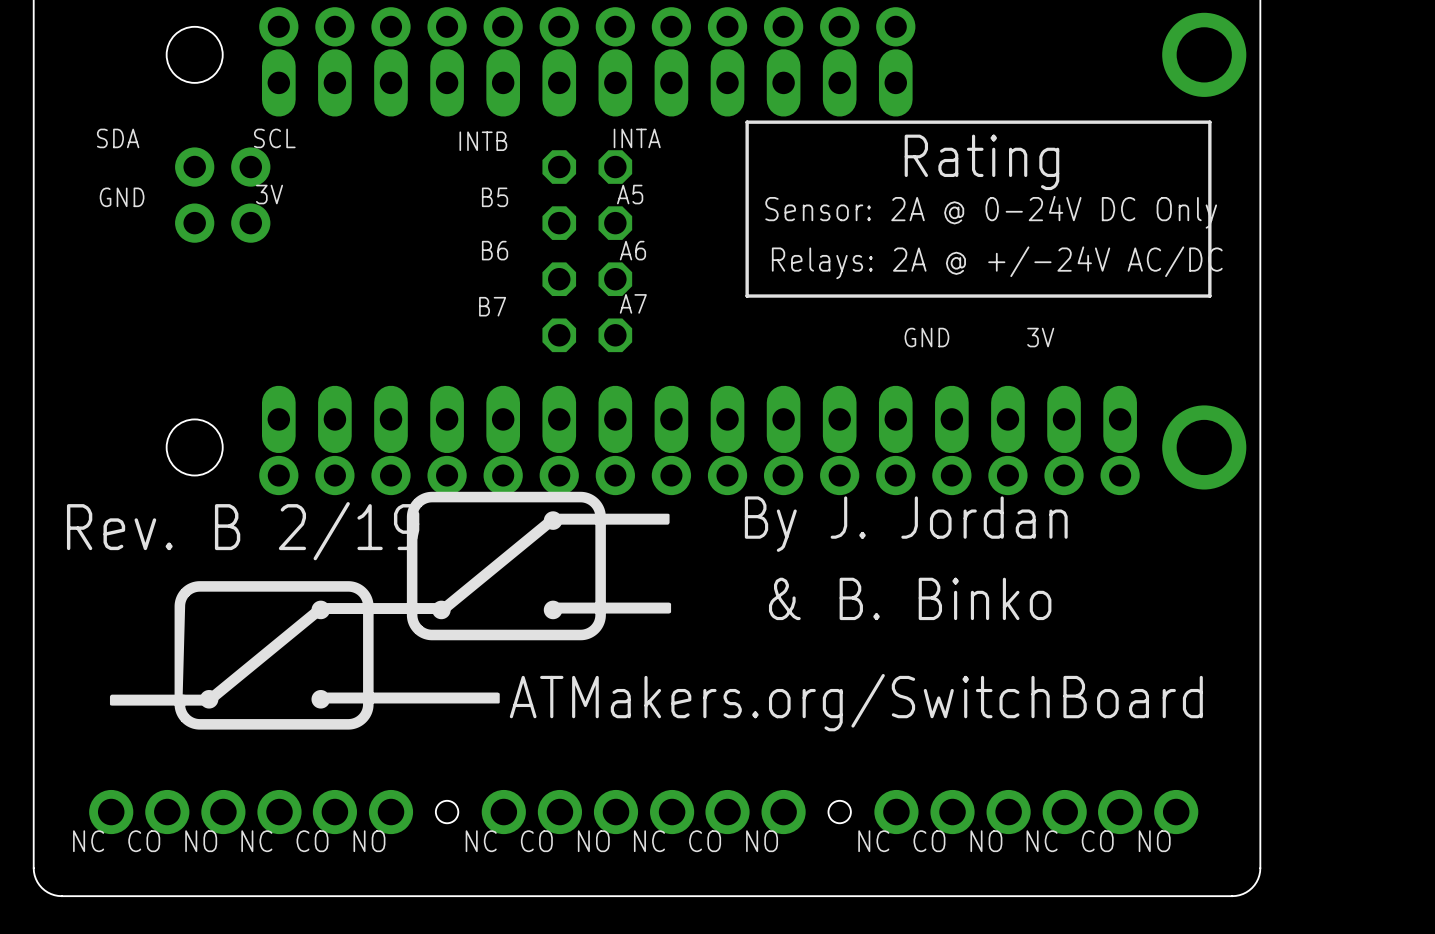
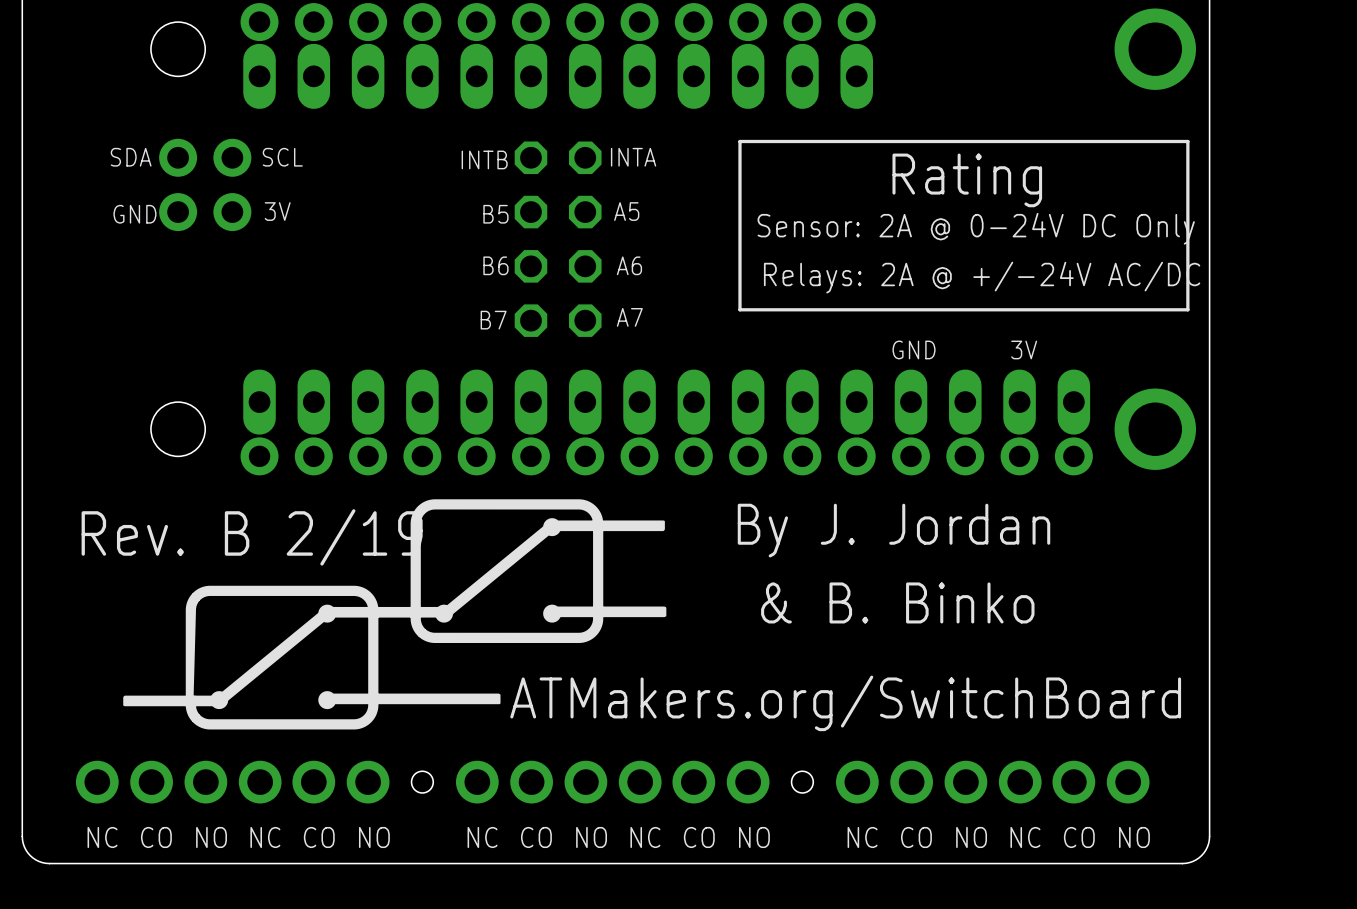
line: (1209, 122) (747, 122) (747, 296) (1209, 296) (1209, 122) -> (1187, 141) (739, 141) (739, 309) (1187, 309) (1187, 141)
text position: SDA (118, 138) -> SDA (131, 157)
text position: SCL (274, 138) -> SCL (282, 157)
text position: INTA (637, 138) -> INTA (633, 157)
text position: INTB (483, 141) -> INTB (484, 159)
text position: Rating (981, 162) -> Rating (967, 180)
text position: 3V (269, 194) -> 3V (277, 211)
text position: A5 (630, 194) -> A5 (626, 211)
text position: GND (122, 197) -> GND (134, 214)
text position: B5 (495, 197) -> B5 (495, 214)
text position: Sensor: 2A @ 0-24V DC Only (991, 212) -> Sensor: 2A @ 0-24V DC Only (976, 228)
text position: B6 (495, 250) -> B6 (495, 265)
text position: A6 (632, 250) -> A6 (629, 265)
text position: Relays: 2A @ +/-24V AC/DC (997, 262) -> Relays: 2A @ +/-24V AC/DC (982, 277)
text position: A7 (633, 303) -> A7 (629, 317)
text position: B7 (492, 306) -> B7 (493, 320)
text position: GND (926, 337) -> GND (914, 349)
text position: 3V (1040, 337) -> 3V (1024, 349)
text position: By J. Jordan (906, 524) -> By J. Jordan (893, 530)
text position: Rev. B 2/19 (243, 531) -> Rev. B 2/19 (252, 537)
text position: & B. Binko (910, 598) -> & B. Binko (897, 602)
drawing position: (390, 610) -> (394, 614)
text position: ATMakers.org/SwitchBoard (856, 702) -> ATMakers.org/SwitchBoard (845, 703)
text position: NC (88, 841) -> NC (102, 837)
text position: CO (144, 841) -> CO (156, 837)
text position: NO (201, 841) -> NO (211, 837)
text position: NC (256, 841) -> NC (265, 837)
text position: CO (312, 841) -> CO (319, 837)
text position: NO (369, 841) -> NO (374, 837)
text position: NC (481, 841) -> NC (482, 837)
text position: CO (536, 841) -> CO (536, 837)
text position: NO (593, 841) -> NO (591, 837)
text position: NC (649, 841) -> NC (645, 837)
text position: CO (705, 841) -> CO (699, 837)
text position: NO (762, 841) -> NO (754, 837)
text position: NC (873, 841) -> NC (862, 837)
text position: CO (929, 841) -> CO (916, 837)
text position: NO (986, 841) -> NO (971, 837)
text position: NC (1042, 841) -> NC (1025, 837)
text position: CO (1097, 841) -> CO (1079, 837)
text position: NO (1154, 841) -> NO (1134, 837)

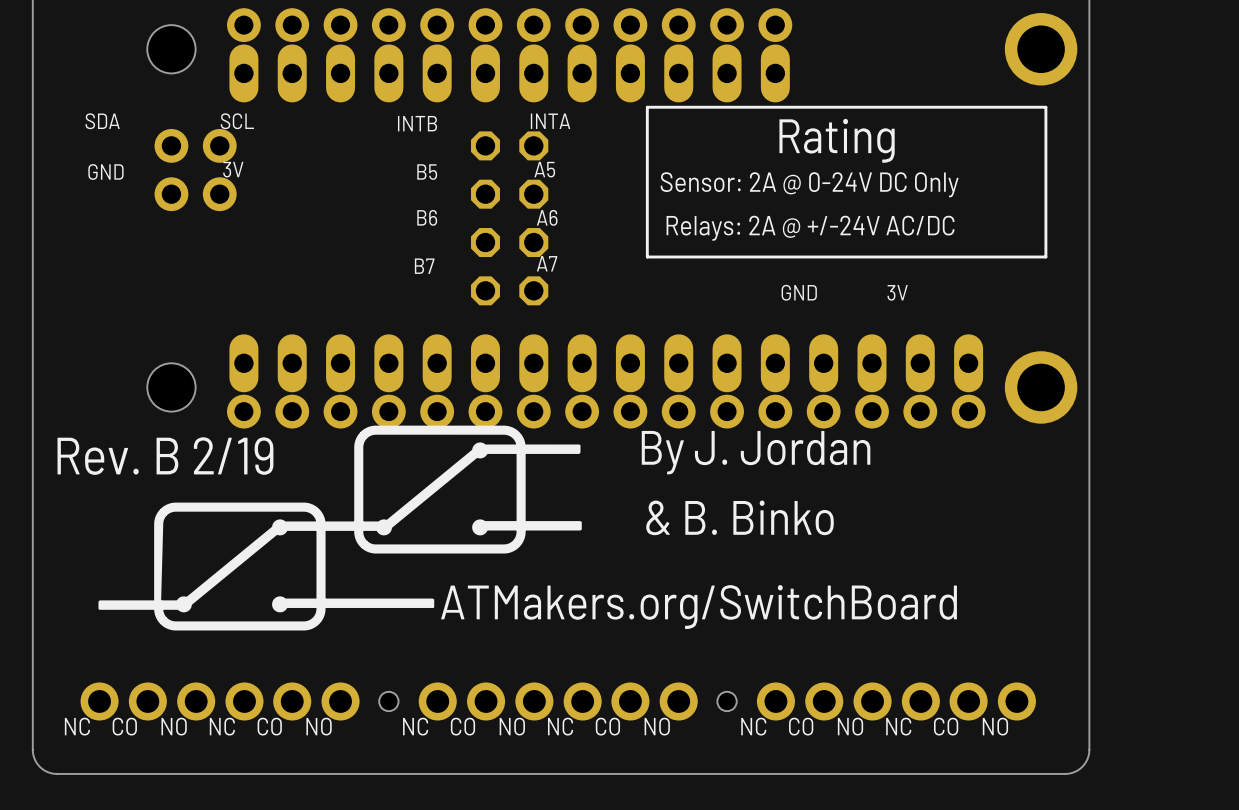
line: (1187, 141) (739, 141) (739, 309) (1187, 309) (1187, 141) -> (1045, 107) (647, 107) (647, 257) (1045, 257) (1045, 107)
text position: SDA (131, 157) -> SDA (102, 121)
text position: SCL (282, 157) -> SCL (237, 121)
text position: INTA (633, 157) -> INTA (550, 121)
text position: INTB (484, 159) -> INTB (417, 123)
text position: Rating (967, 180) -> Rating (837, 140)
text position: 3V (277, 211) -> 3V (233, 169)
text position: A5 (626, 211) -> A5 (544, 169)
text position: GND (134, 214) -> GND (105, 171)
text position: B5 (495, 214) -> B5 (427, 172)
text position: Sensor: 2A @ 0-24V DC Only (976, 228) -> Sensor: 2A @ 0-24V DC Only (809, 184)
text position: B6 (495, 265) -> B6 (427, 217)
text position: A6 (629, 265) -> A6 (547, 217)
text position: Relays: 2A @ +/-24V AC/DC (982, 277) -> Relays: 2A @ +/-24V AC/DC (810, 228)
text position: A7 (629, 317) -> A7 (547, 263)
text position: B7 (493, 320) -> B7 (424, 266)
text position: GND (914, 349) -> GND (799, 292)
text position: 3V (1024, 349) -> 3V (897, 292)
text position: By J. Jordan (893, 530) -> By J. Jordan (756, 452)
text position: Rev. B 2/19 (252, 537) -> Rev. B 2/19 (165, 456)
text position: & B. Binko (897, 602) -> & B. Binko (740, 517)
drawing position: (394, 614) -> (340, 528)
text position: ATMakers.org/SwitchBoard (845, 703) -> ATMakers.org/SwitchBoard (698, 607)
text position: NC (102, 837) -> NC (77, 726)
text position: CO (156, 837) -> CO (124, 726)
text position: NO (211, 837) -> NO (174, 726)
text position: NC (265, 837) -> NC (222, 726)
text position: CO (319, 837) -> CO (269, 726)
text position: NO (374, 837) -> NO (319, 726)
text position: NC (482, 837) -> NC (415, 726)
text position: CO (536, 837) -> CO (462, 726)
text position: NO (591, 837) -> NO (512, 726)
text position: NC (645, 837) -> NC (560, 726)
text position: CO (699, 837) -> CO (607, 726)
text position: NO (754, 837) -> NO (657, 726)
text position: NC (862, 837) -> NC (753, 726)
text position: CO (916, 837) -> CO (801, 726)
text position: NO (971, 837) -> NO (850, 726)
text position: NC (1025, 837) -> NC (898, 726)
text position: CO (1079, 837) -> CO (946, 726)
text position: NO (1134, 837) -> NO (995, 726)

